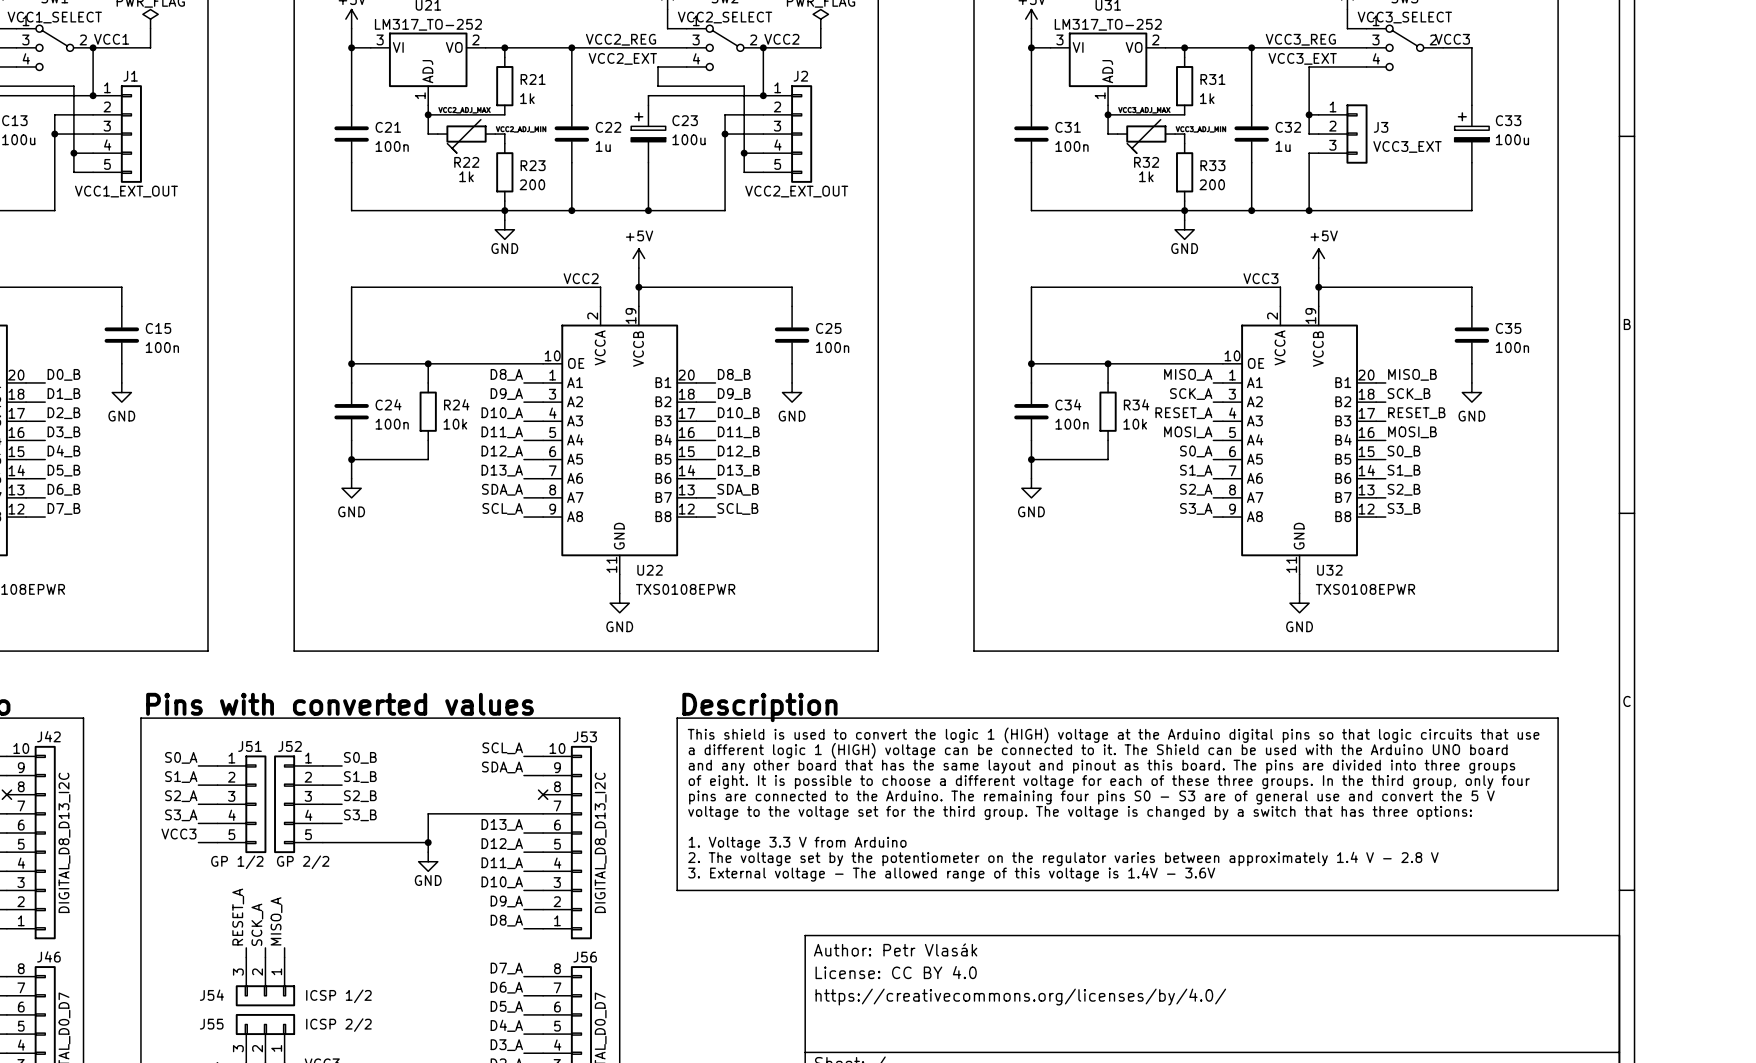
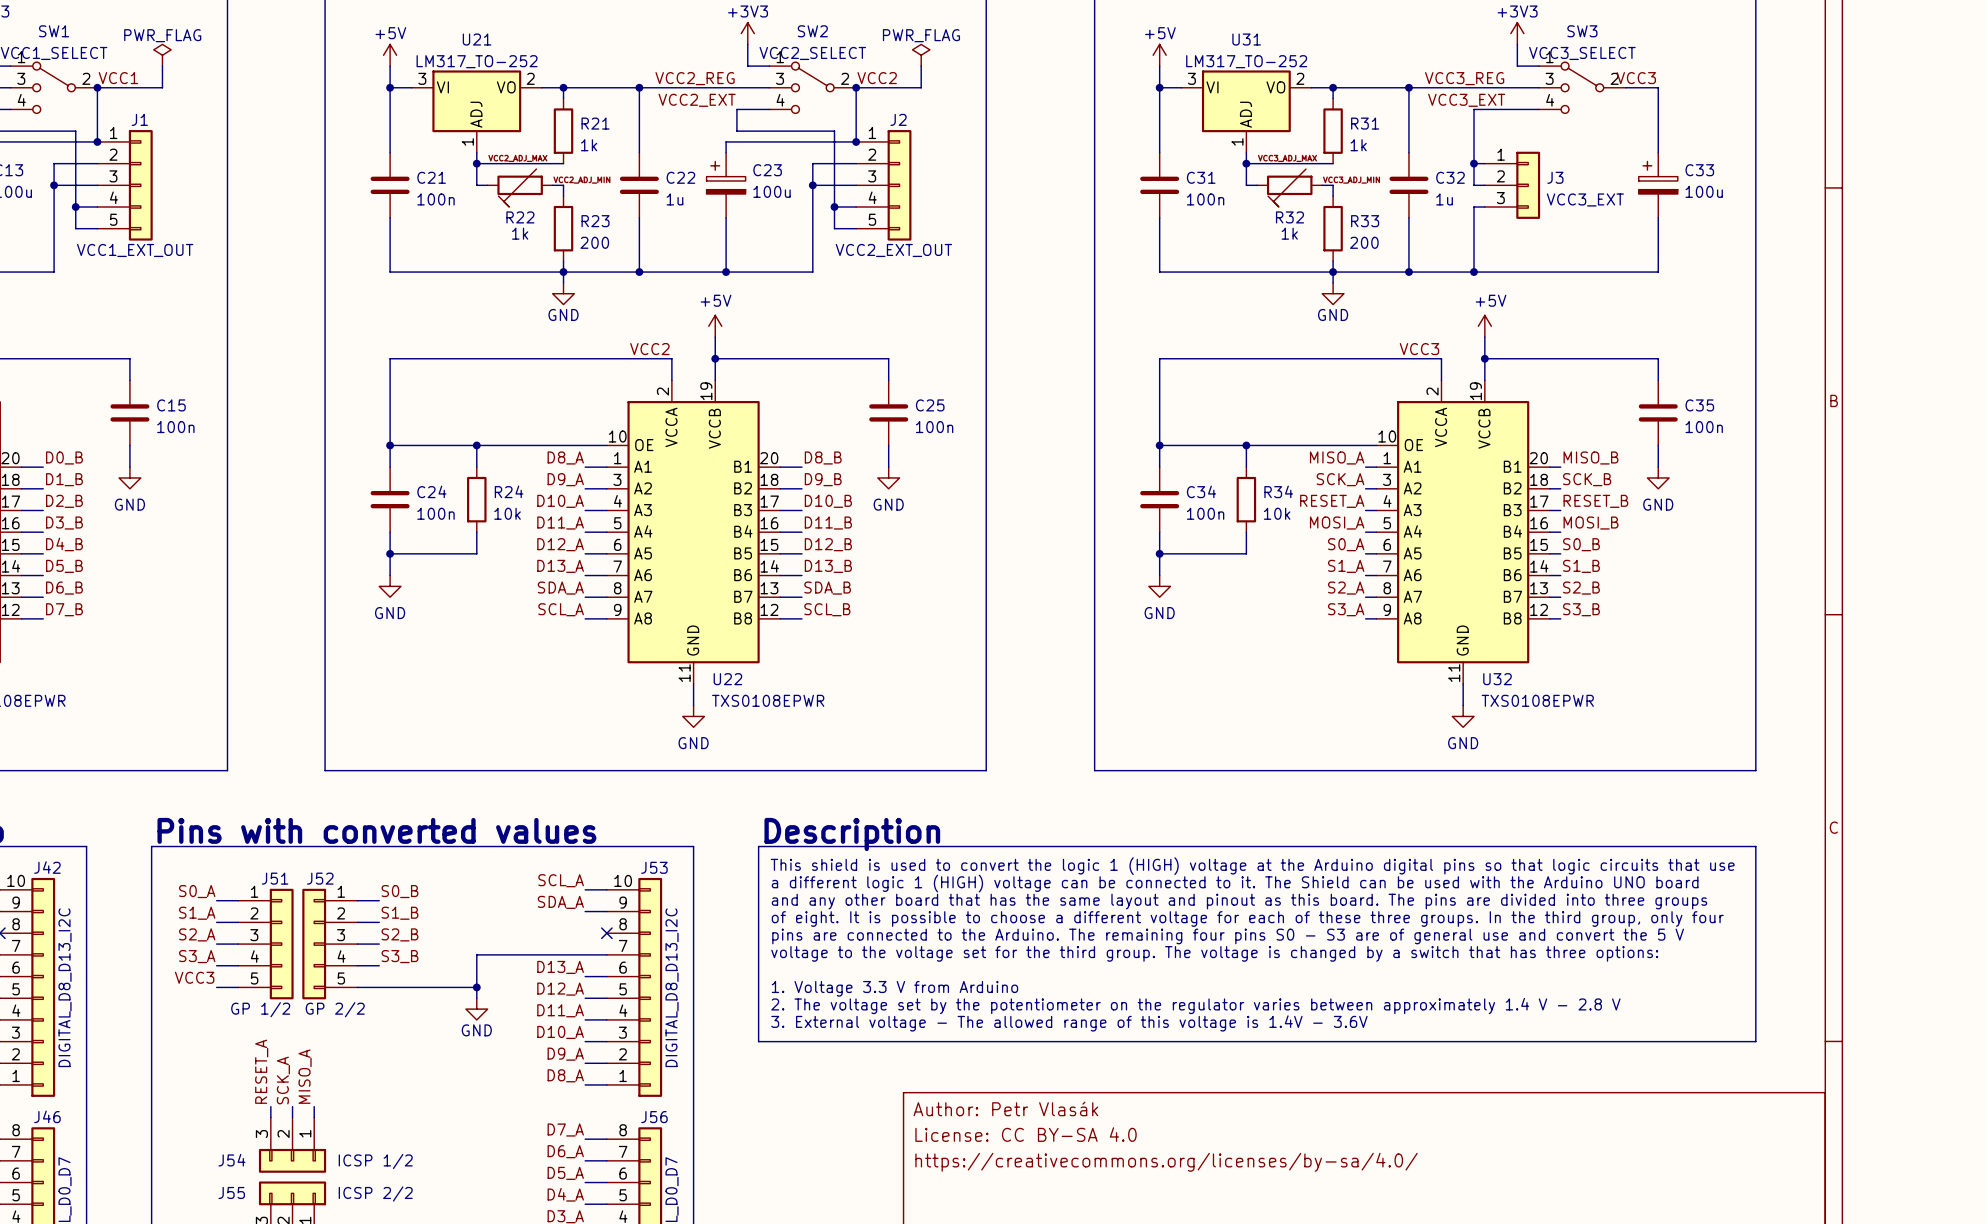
title block: License: CC BY 4.0 (896, 972) -> License: CC BY-SA 4.0 (1026, 1134)
title block: https://creativecommons.org/licenses/by/4.0/ (1020, 997) -> https://creativecommons.org/licenses/by-sa/4.0/ (1166, 1162)

